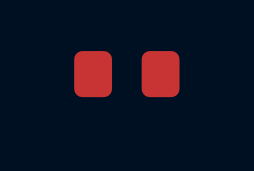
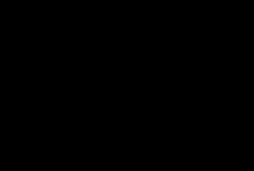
part: (126, 74) -> none

